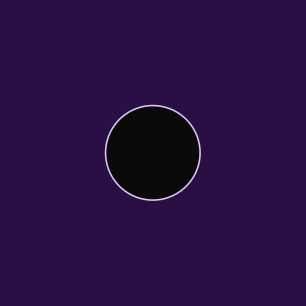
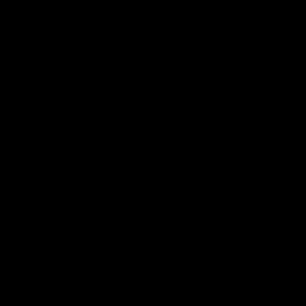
part: (152, 152) -> none

